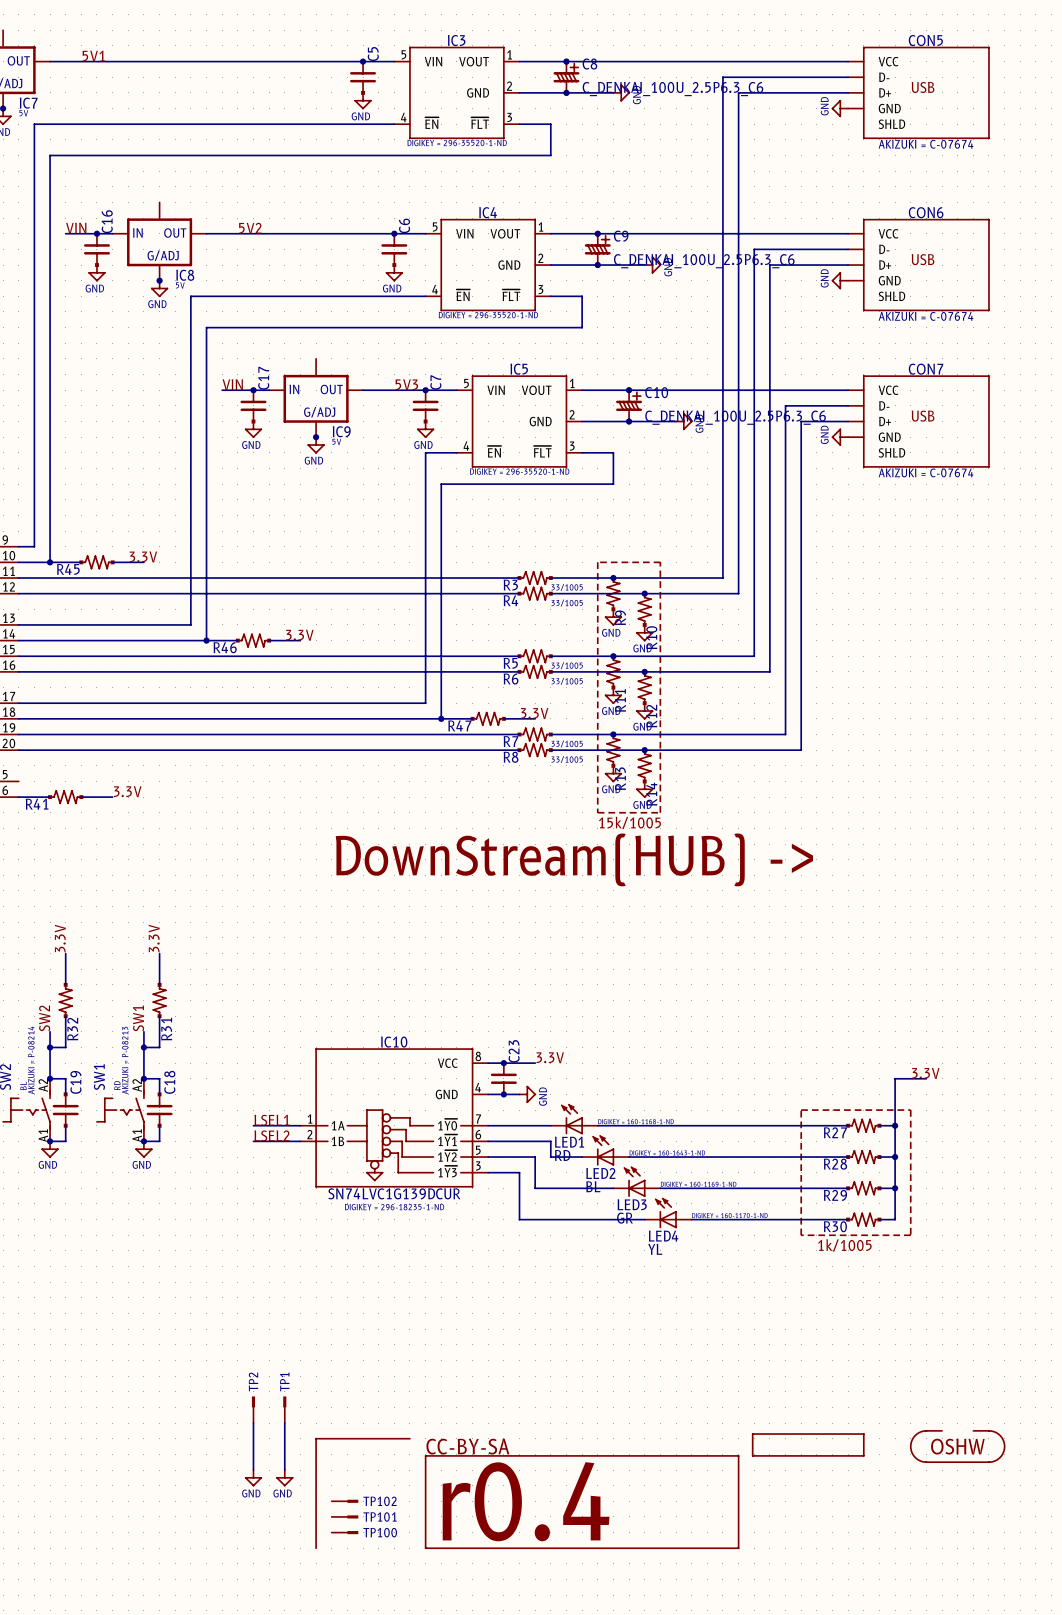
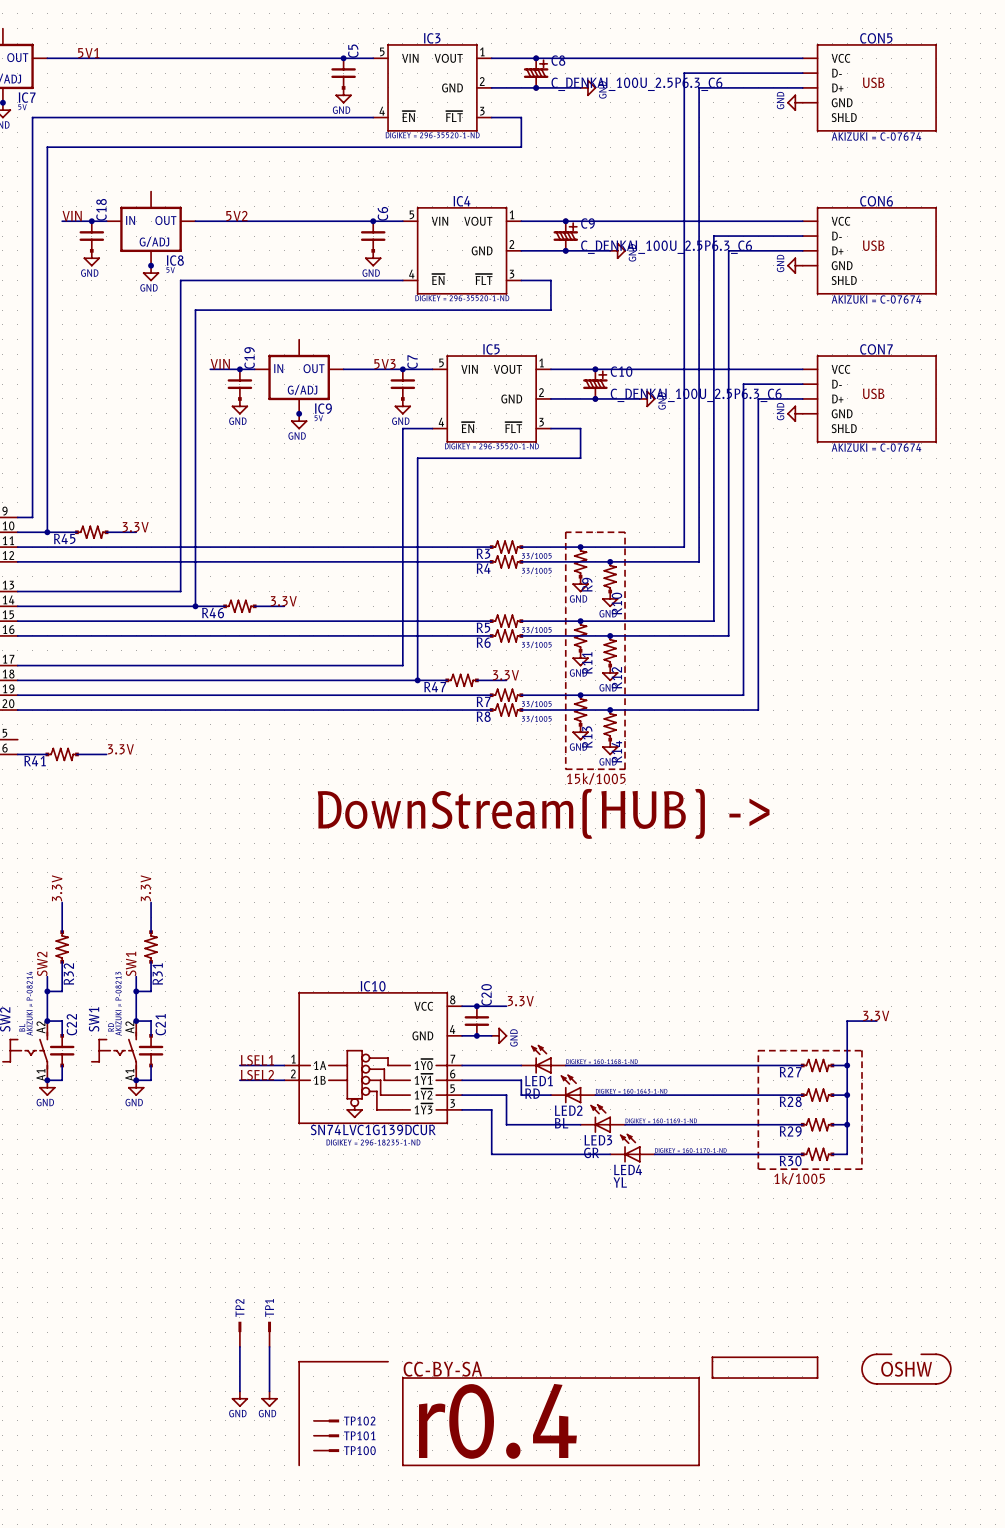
C16 name: C16 (107, 221) -> C18 (101, 209)
C17 name: C17 (263, 378) -> C19 (249, 357)
C23 name: C23 (514, 1051) -> C20 (486, 994)
C19 name: C19 (75, 1082) -> C22 (71, 1024)
C18 name: C18 (169, 1082) -> C21 (160, 1024)

